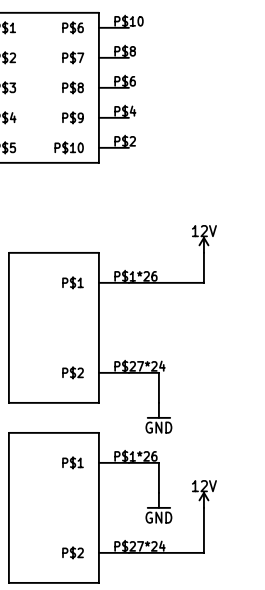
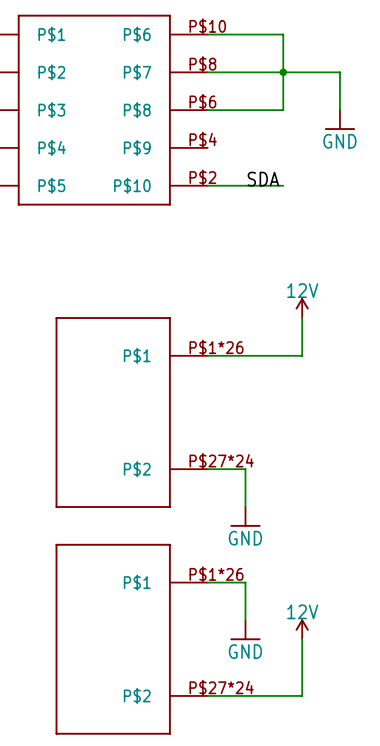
wire: none -> (207, 34) (283, 34) (283, 110) (207, 110)
wire: none -> (207, 72) (339, 72) (339, 110)
junction: none -> (283, 72)
power symbol: none -> GND (339, 120)
label: none -> SDA (263, 179)
wire: none -> (207, 185) (283, 185)

